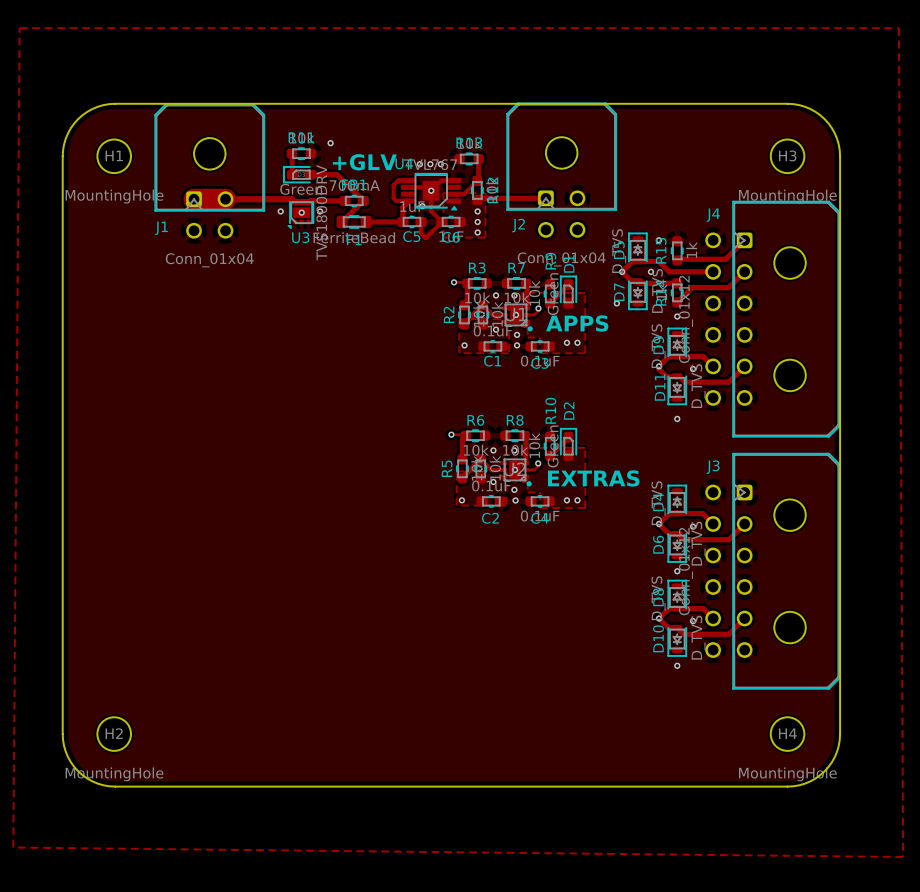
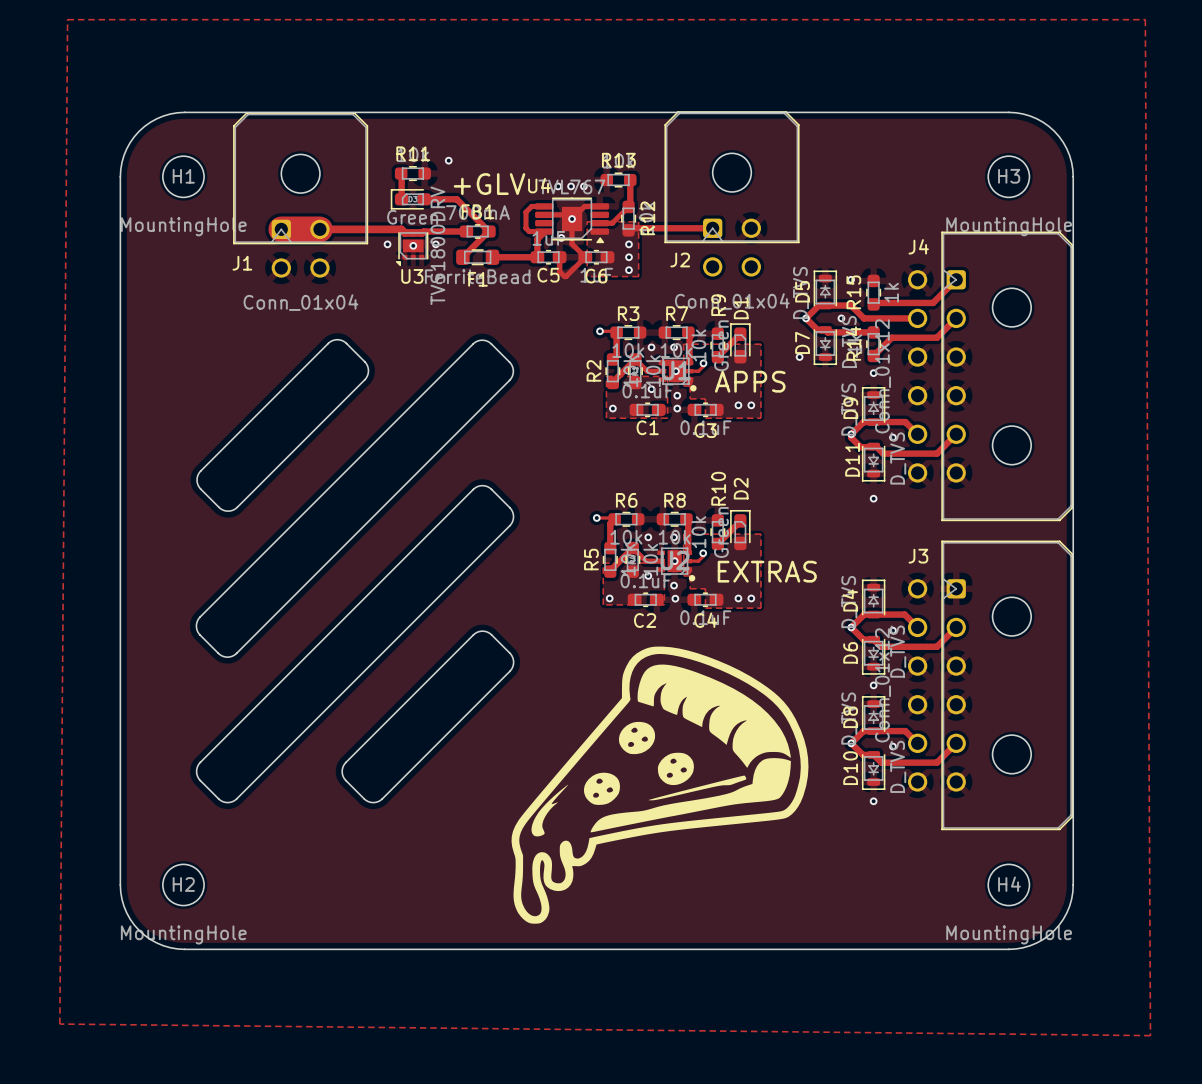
board edge: none -> (328, 343) (198, 473) (197, 480) (198, 486) (221, 509) (229, 511) (237, 507) (366, 377) (368, 370) (366, 364) (346, 343) (337, 339) (328, 343)
board edge: none -> (473, 343) (199, 618) (196, 624) (198, 632) (219, 654) (229, 657) (236, 653) (510, 379) (513, 372) (511, 364) (491, 343) (482, 340) (473, 343)
board edge: none -> (473, 489) (199, 763) (196, 769) (198, 777) (219, 799) (229, 802) (236, 798) (510, 524) (513, 516) (511, 510) (491, 489) (482, 485) (473, 489)
board edge: none -> (473, 634) (344, 764) (342, 771) (344, 778) (366, 800) (374, 802) (382, 798) (511, 668) (513, 662) (511, 655) (491, 634) (482, 631) (473, 634)
drawing: none -> [511, 646, 809, 924]

